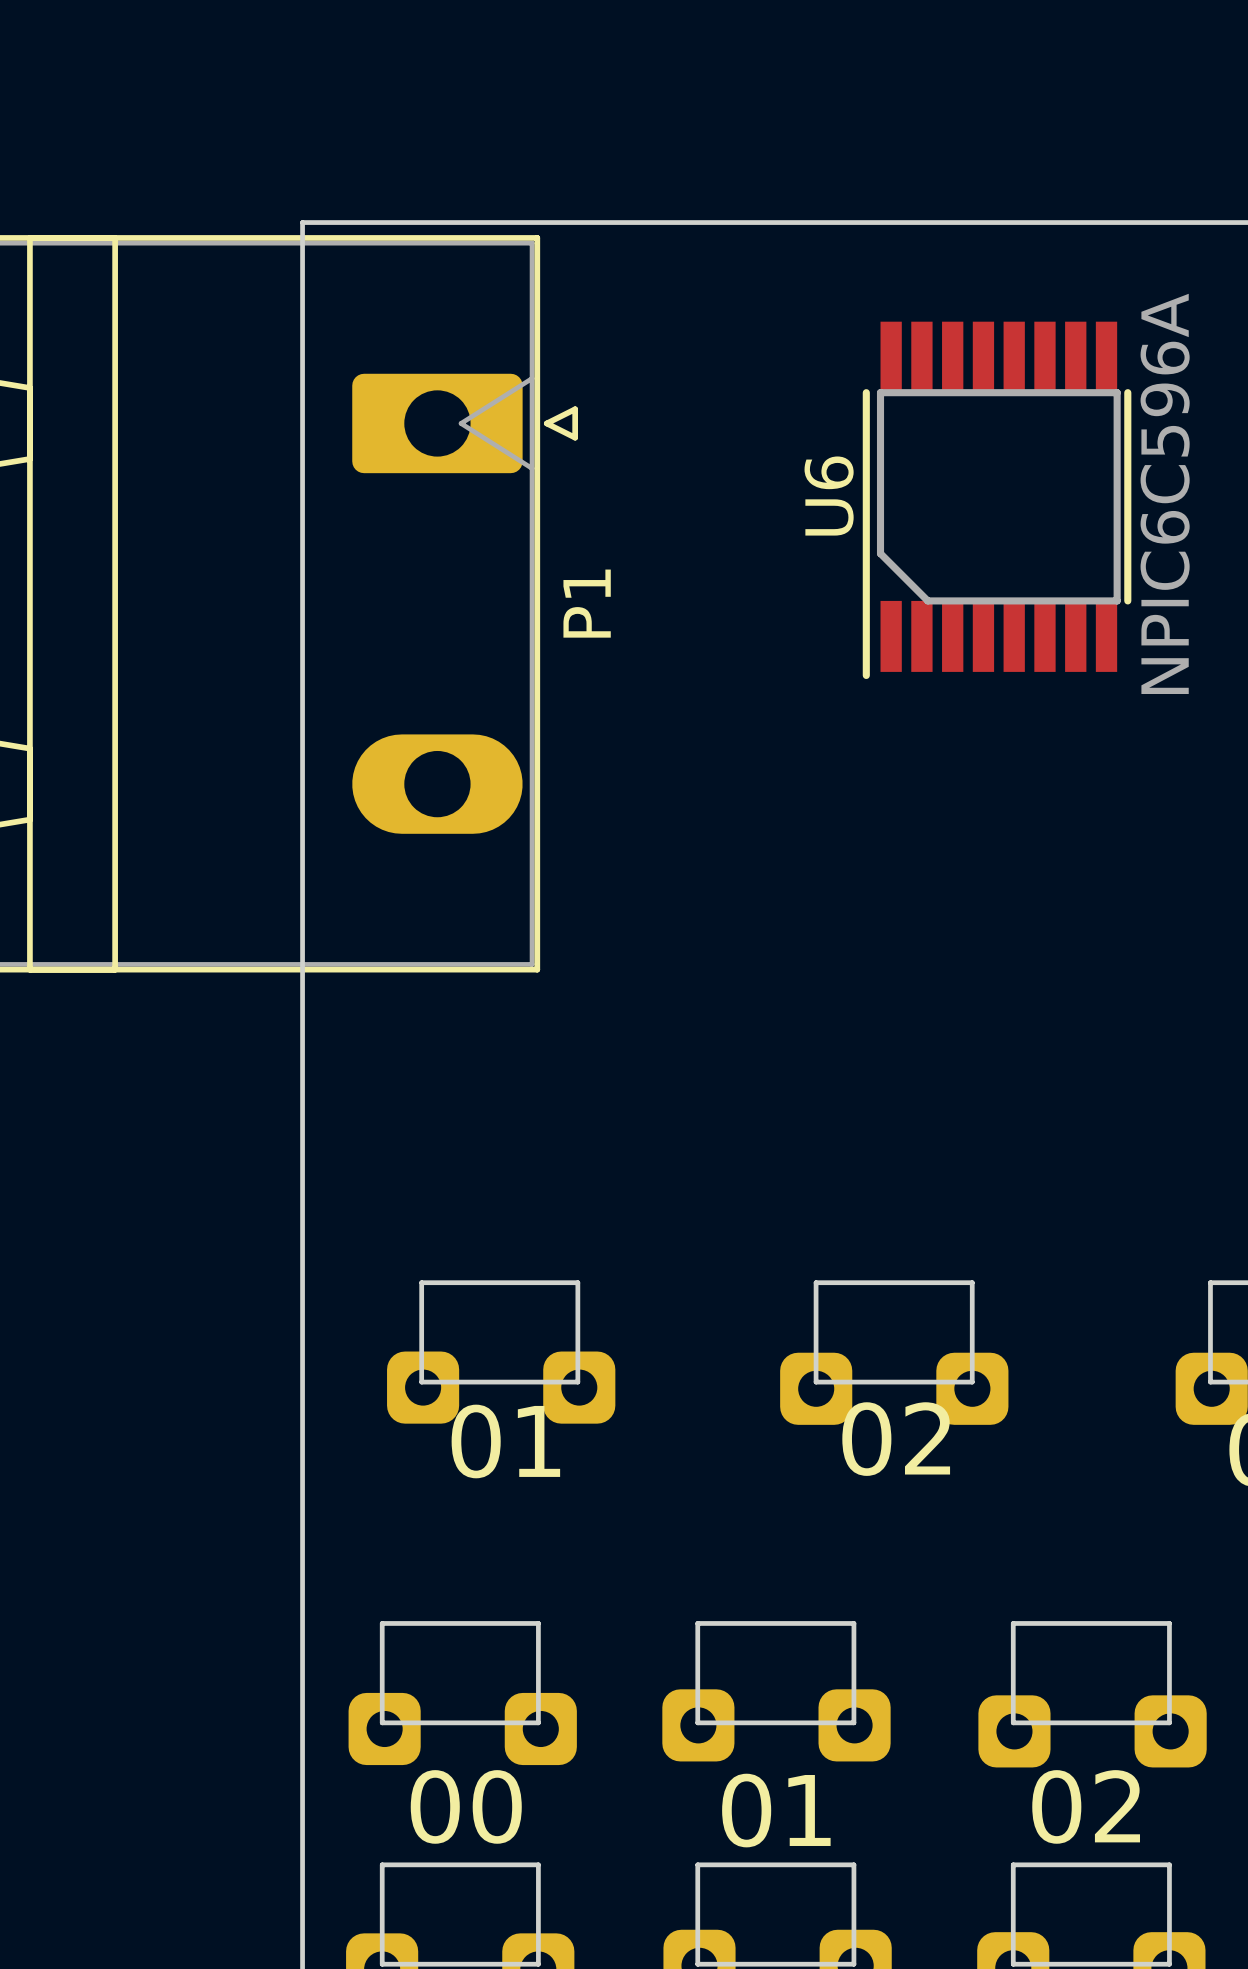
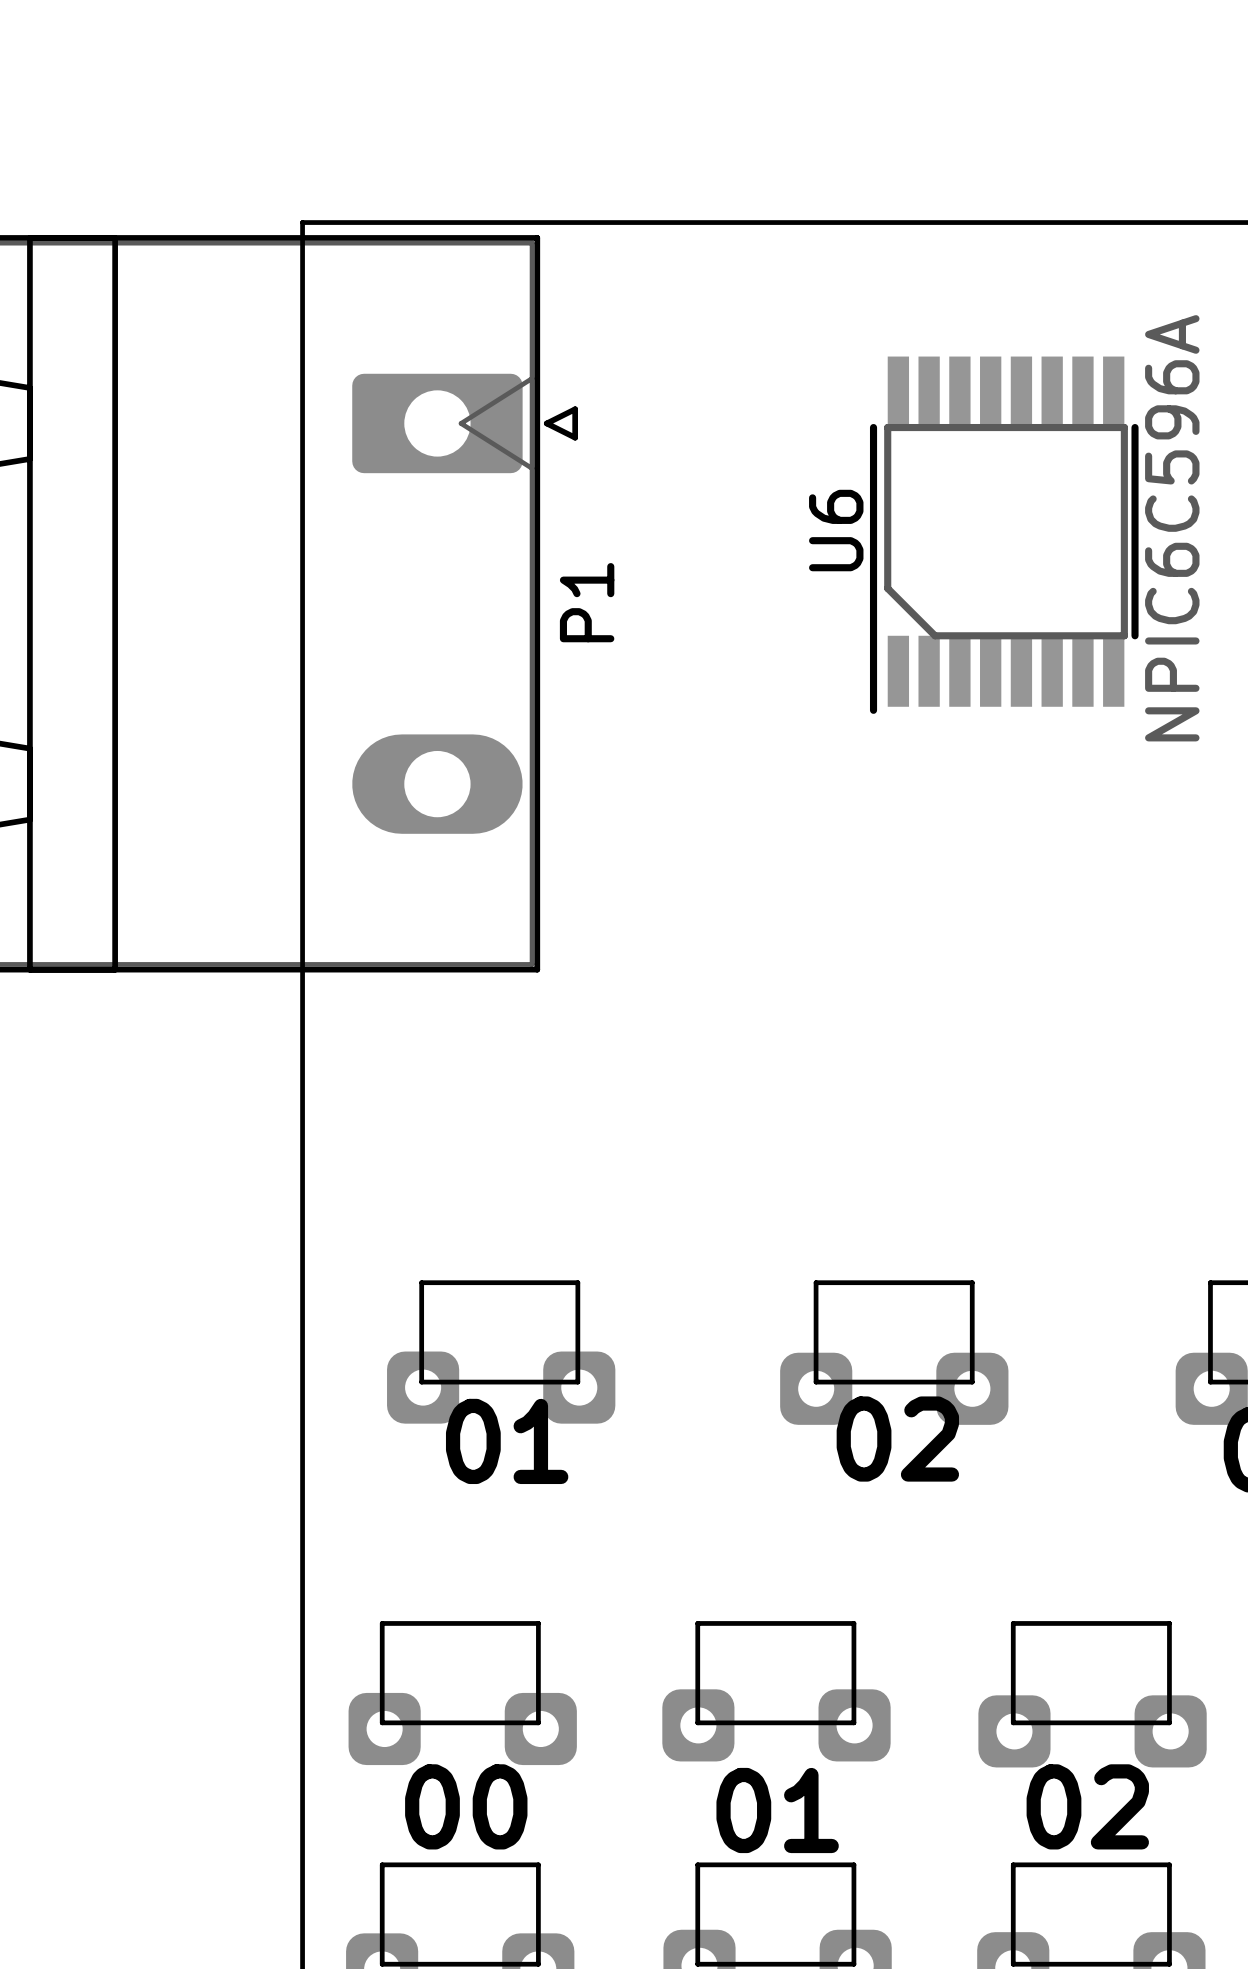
U6 position: (997, 500) -> (1004, 535)

